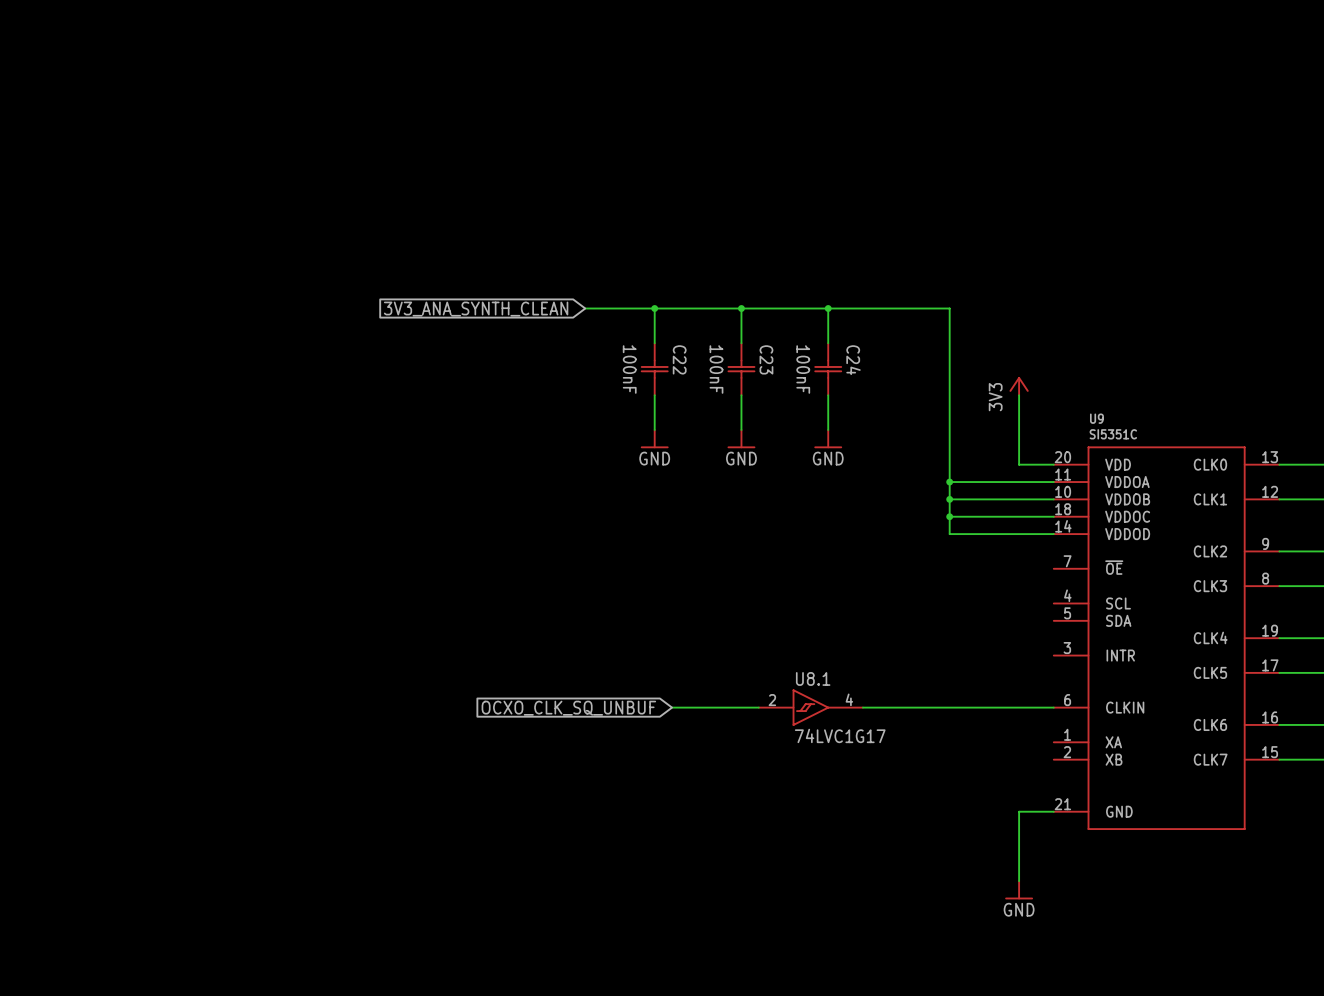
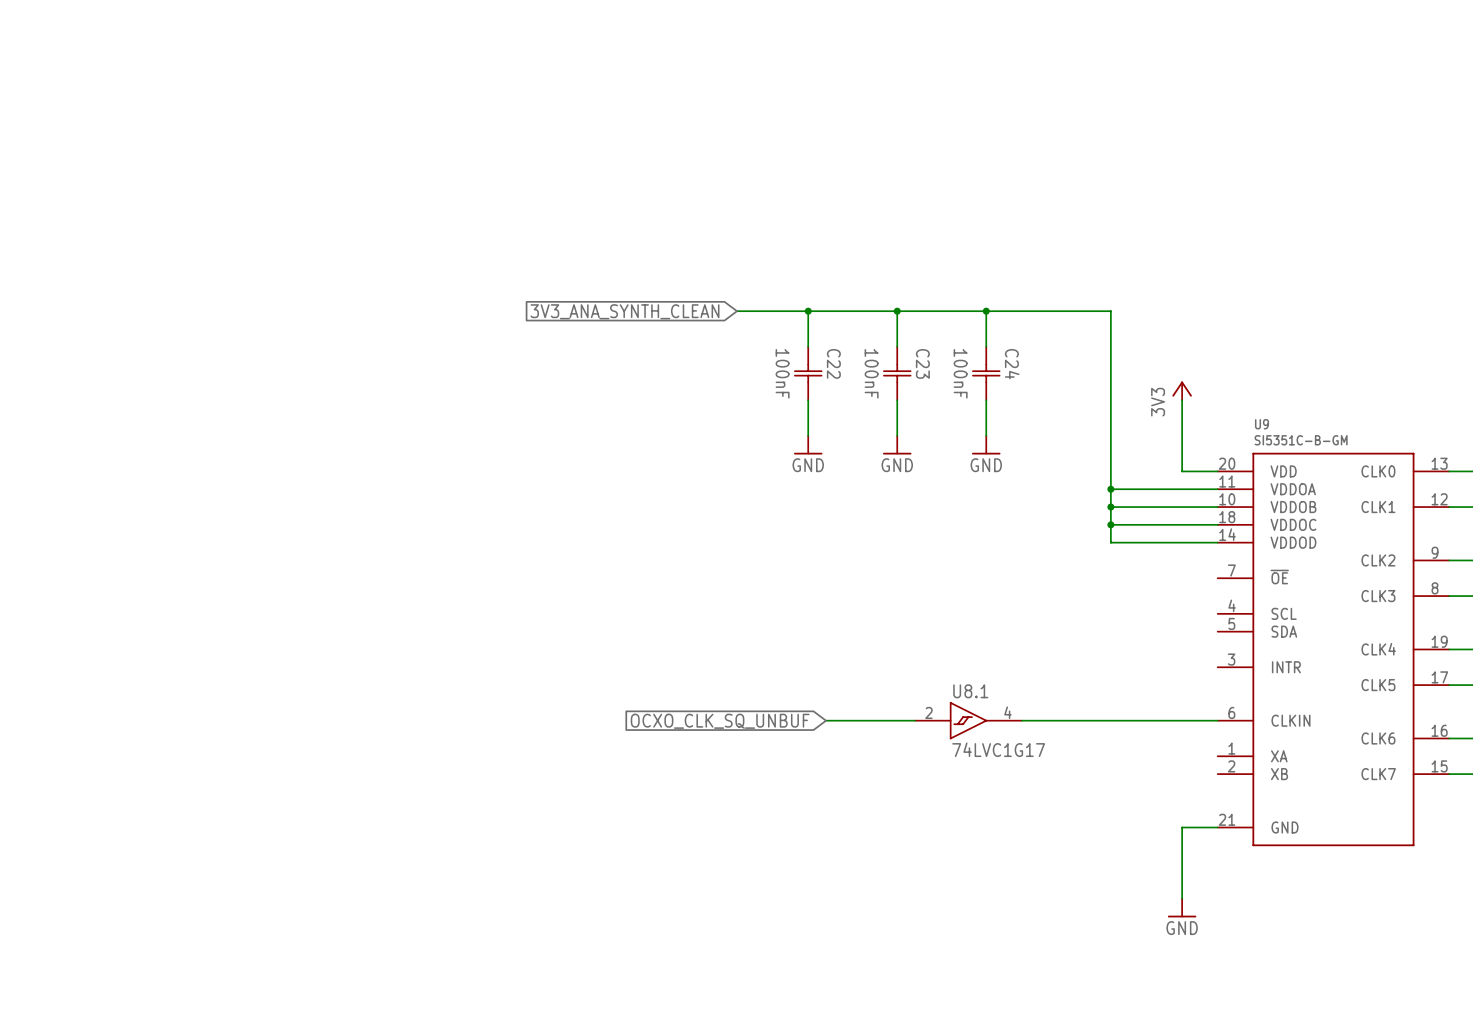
U9 value: SI5351C (1113, 434) -> SI5351C-B-GM (1301, 440)

